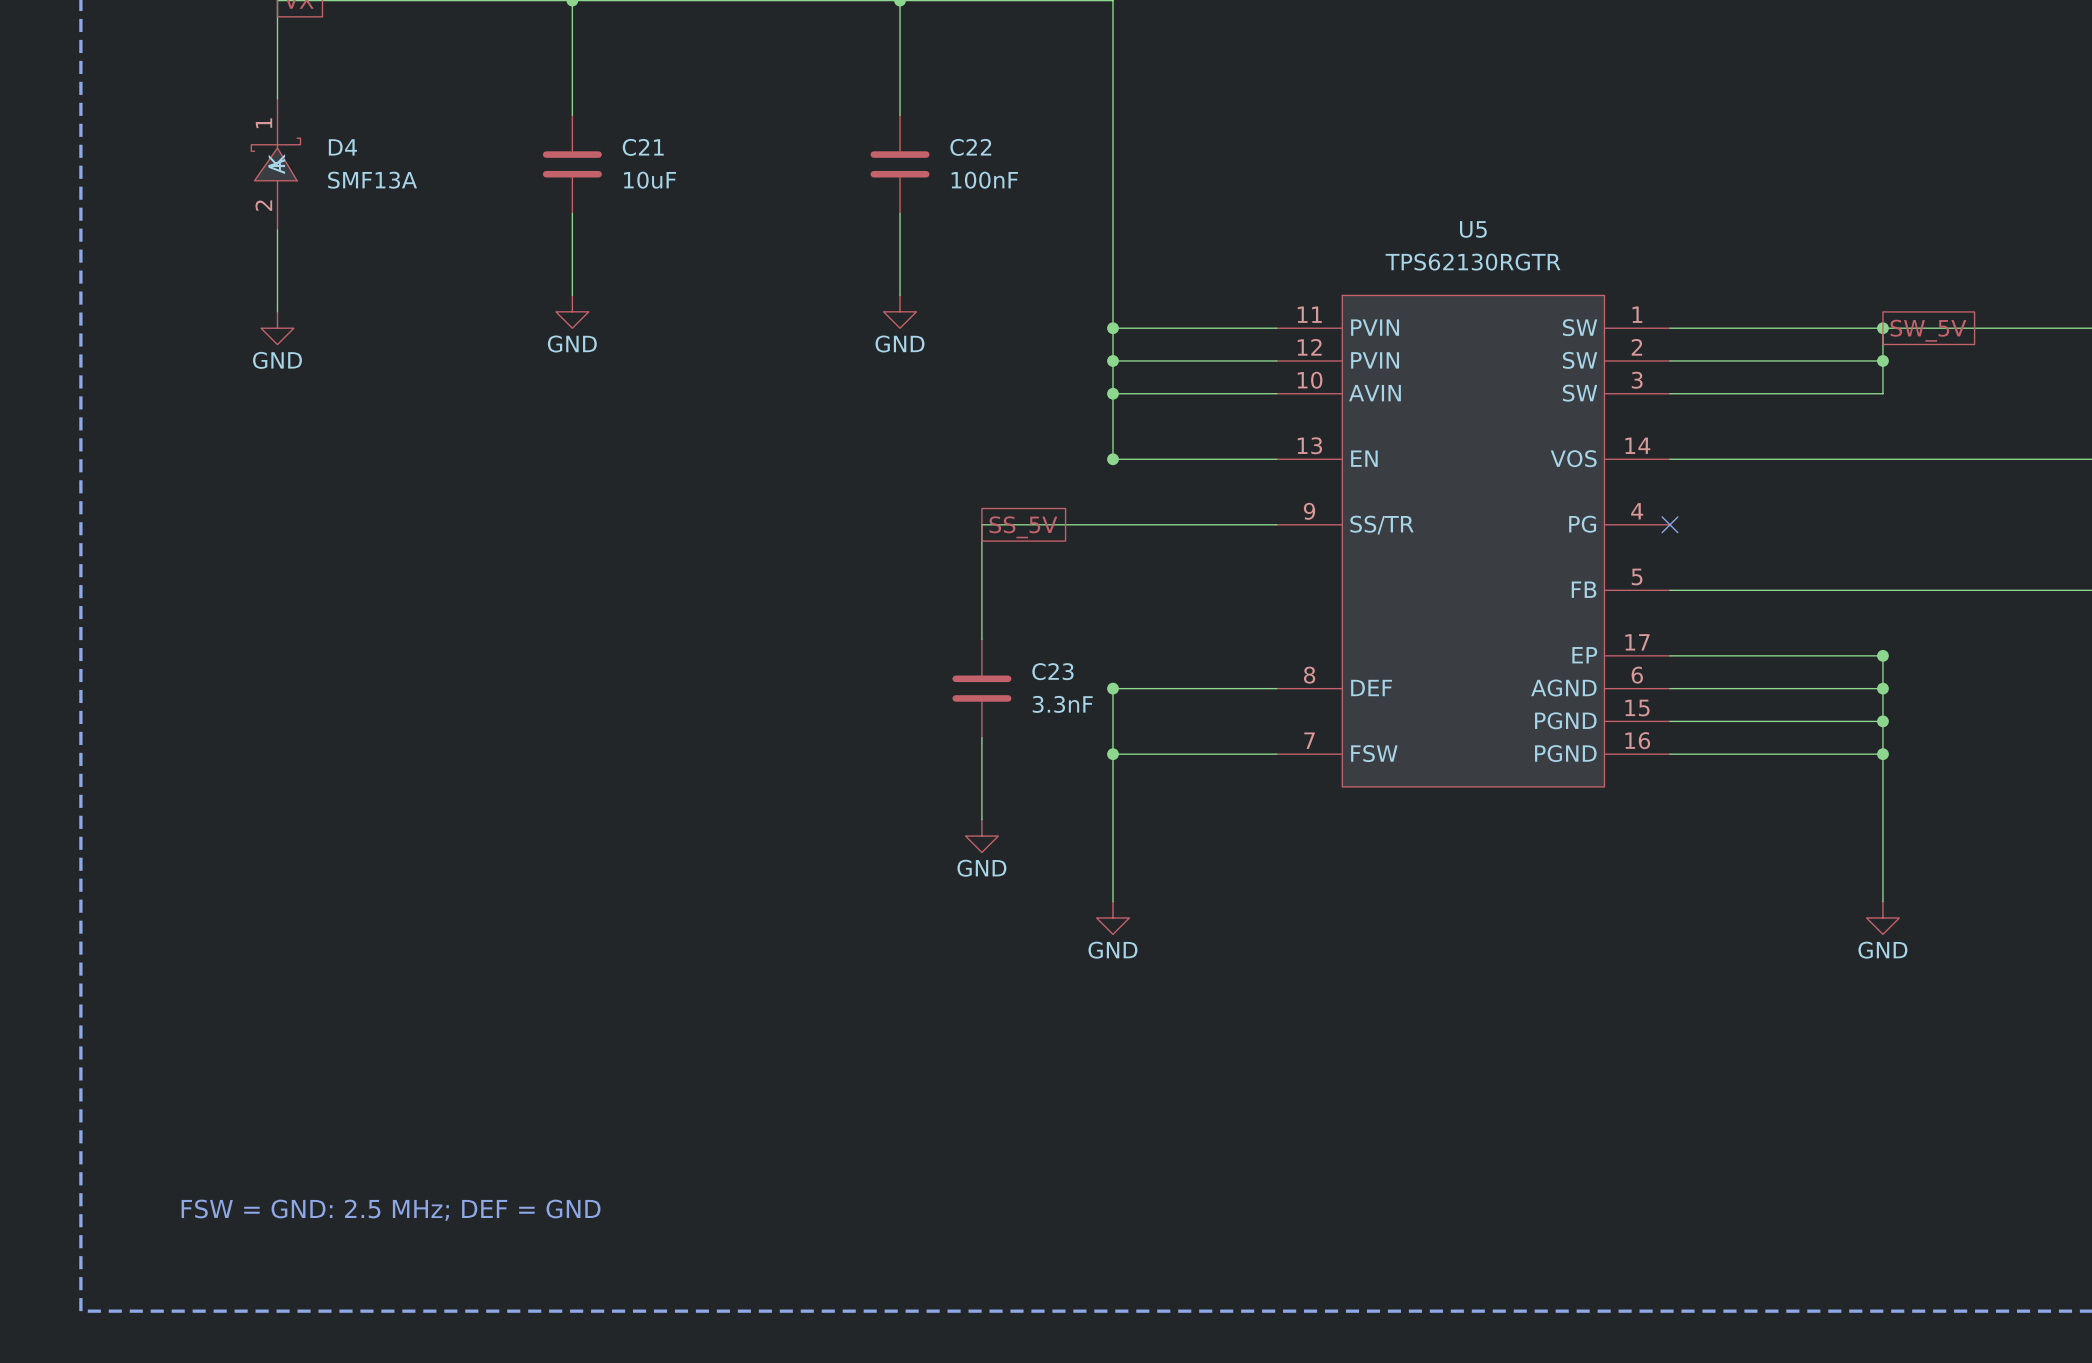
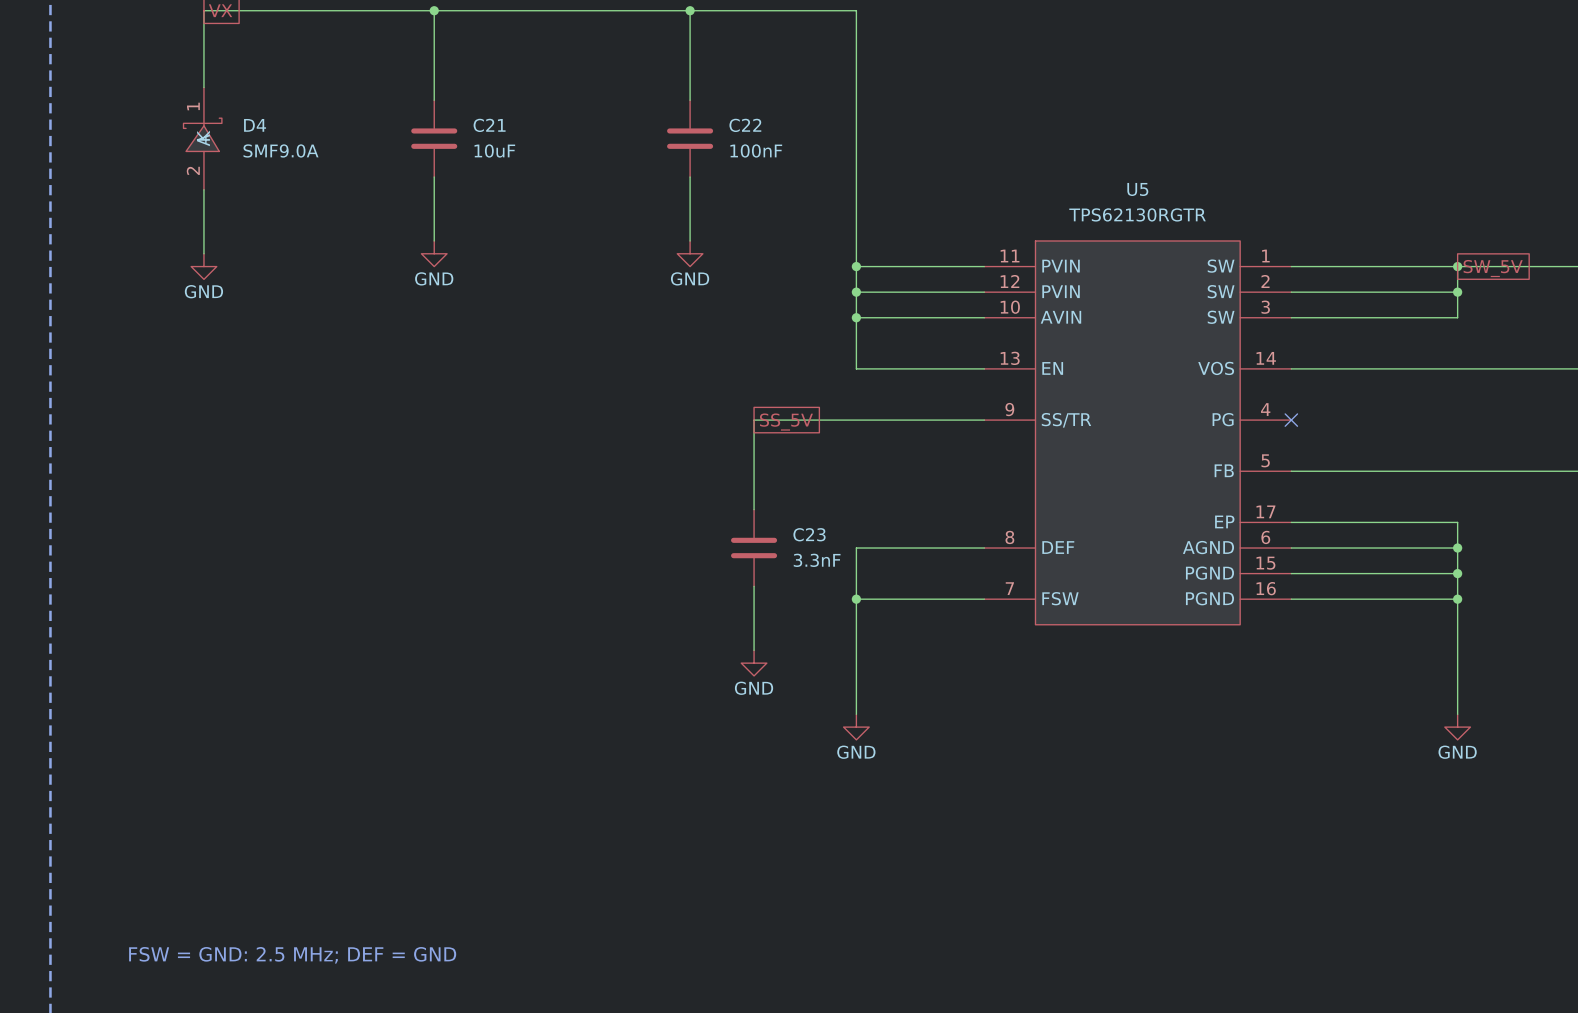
D4 value: SMF13A (372, 180) -> SMF9.0A (280, 150)
junction: (1112, 459) -> none
junction: (1882, 655) -> none
junction: (1112, 688) -> none

